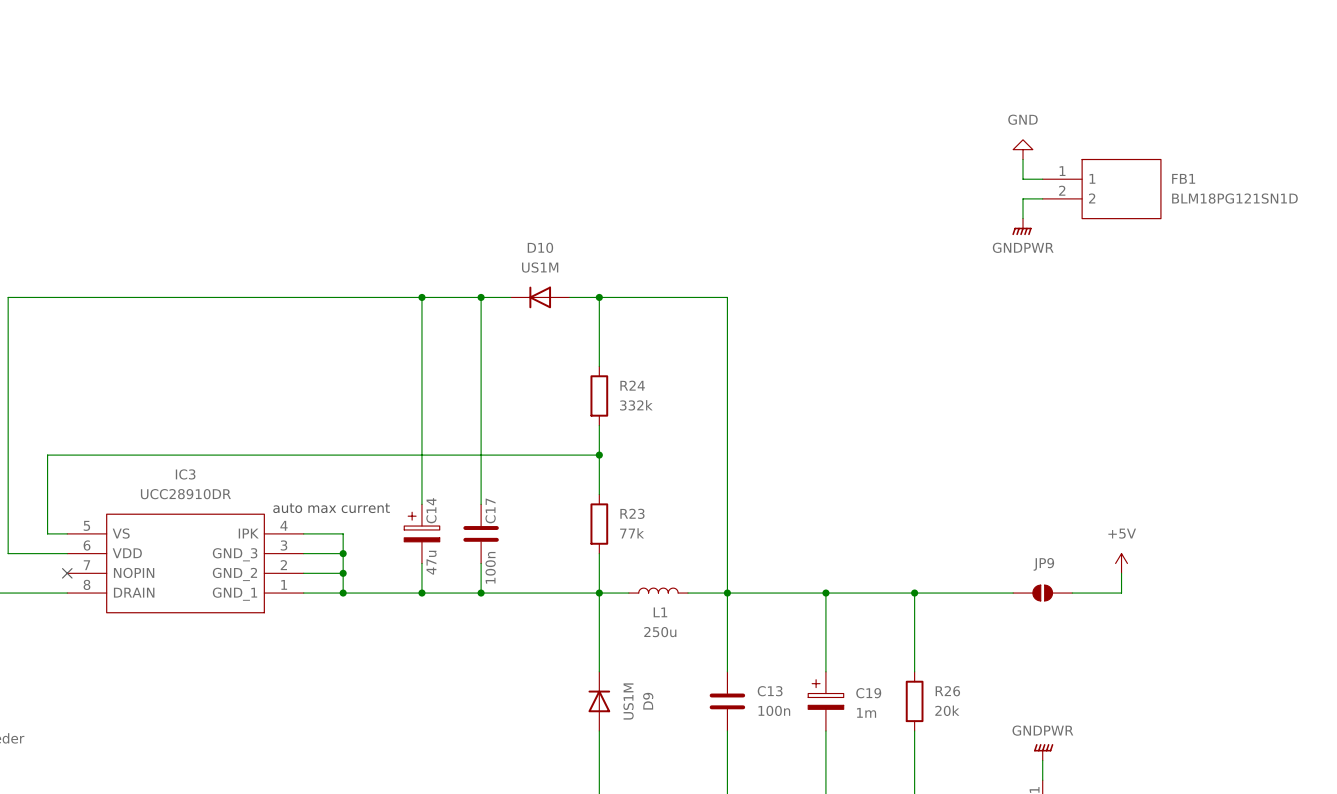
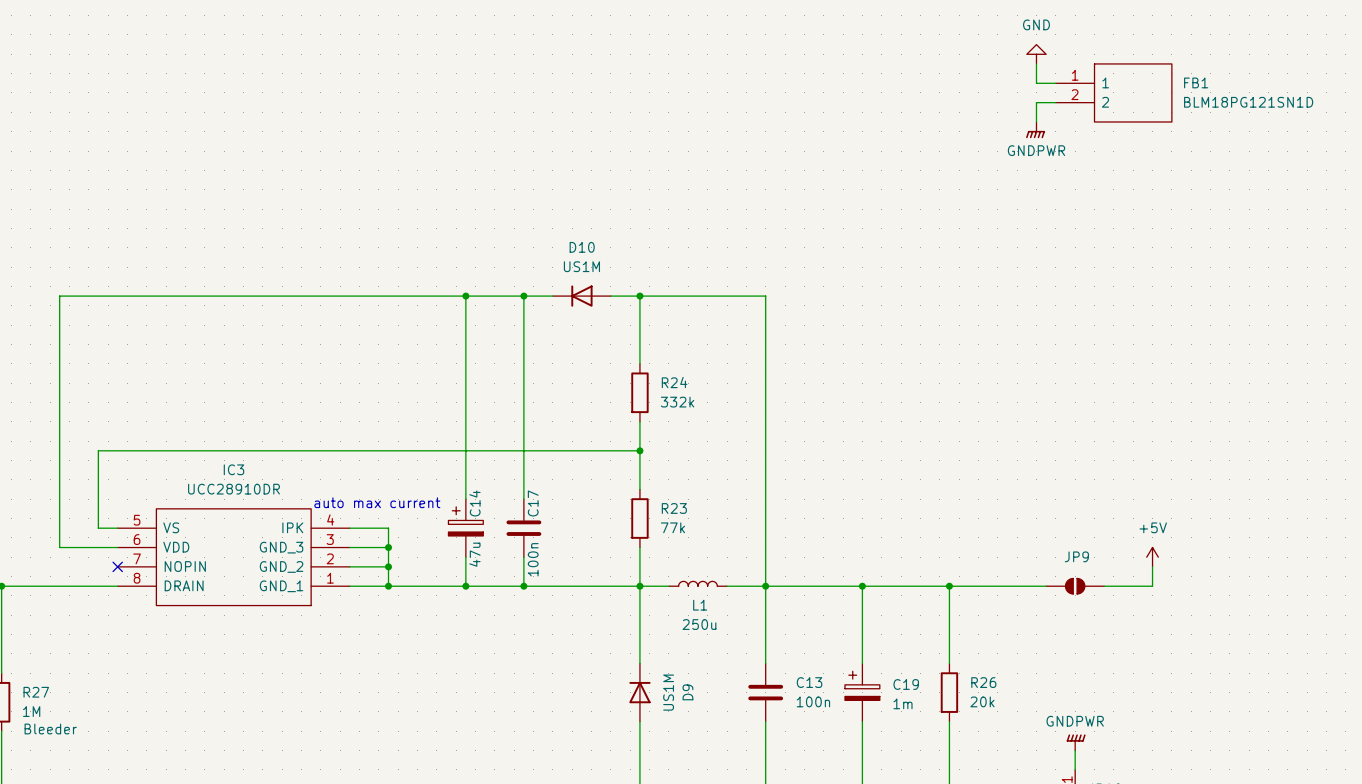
power symbol position: GND (1023, 149) -> GND (1036, 54)
wire: (1023, 159) (1023, 179) (1042, 179) -> (1036, 63) (1036, 83) (1055, 83)
FB1 position: (1102, 189) -> (1114, 92)
wire: (1042, 198) (1023, 198) (1023, 218) -> (1055, 102) (1036, 102) (1036, 121)
power symbol position: GNDPWR (1022, 226) -> GNDPWR (1035, 130)

